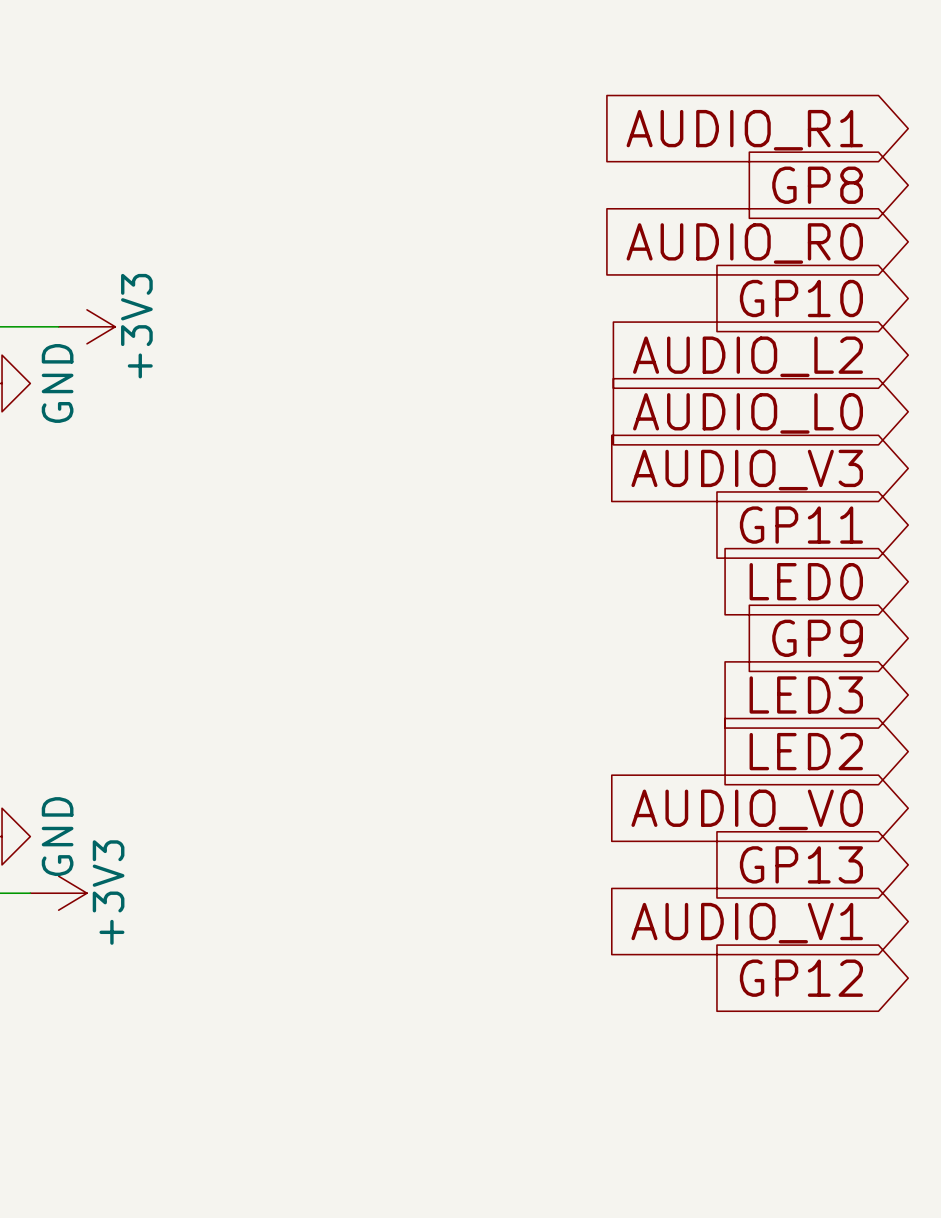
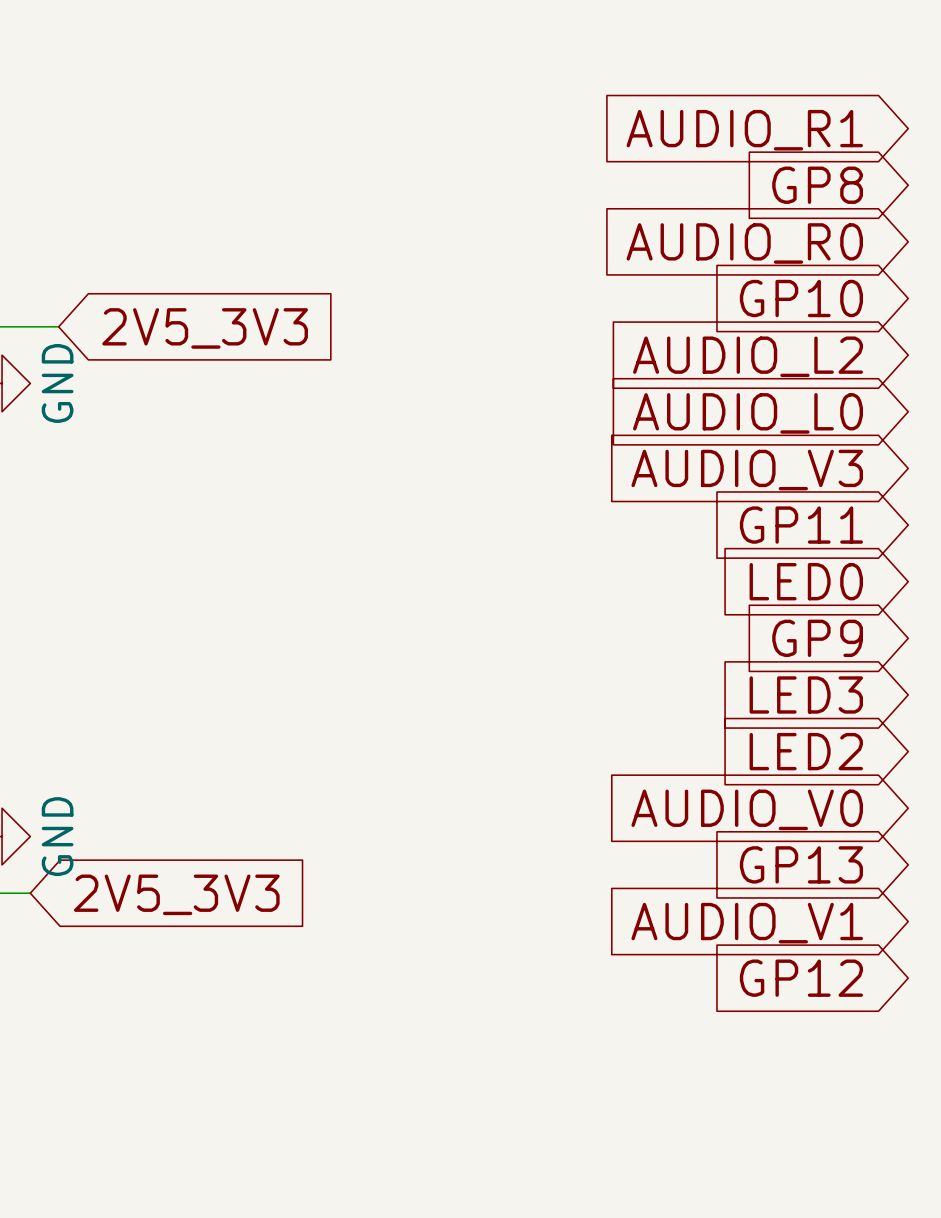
power symbol: +3V3 (86, 326) -> none
global label: none -> 2V5_3V3 (205, 328)
power symbol: +3V3 (58, 893) -> none
global label: none -> 2V5_3V3 (176, 894)

